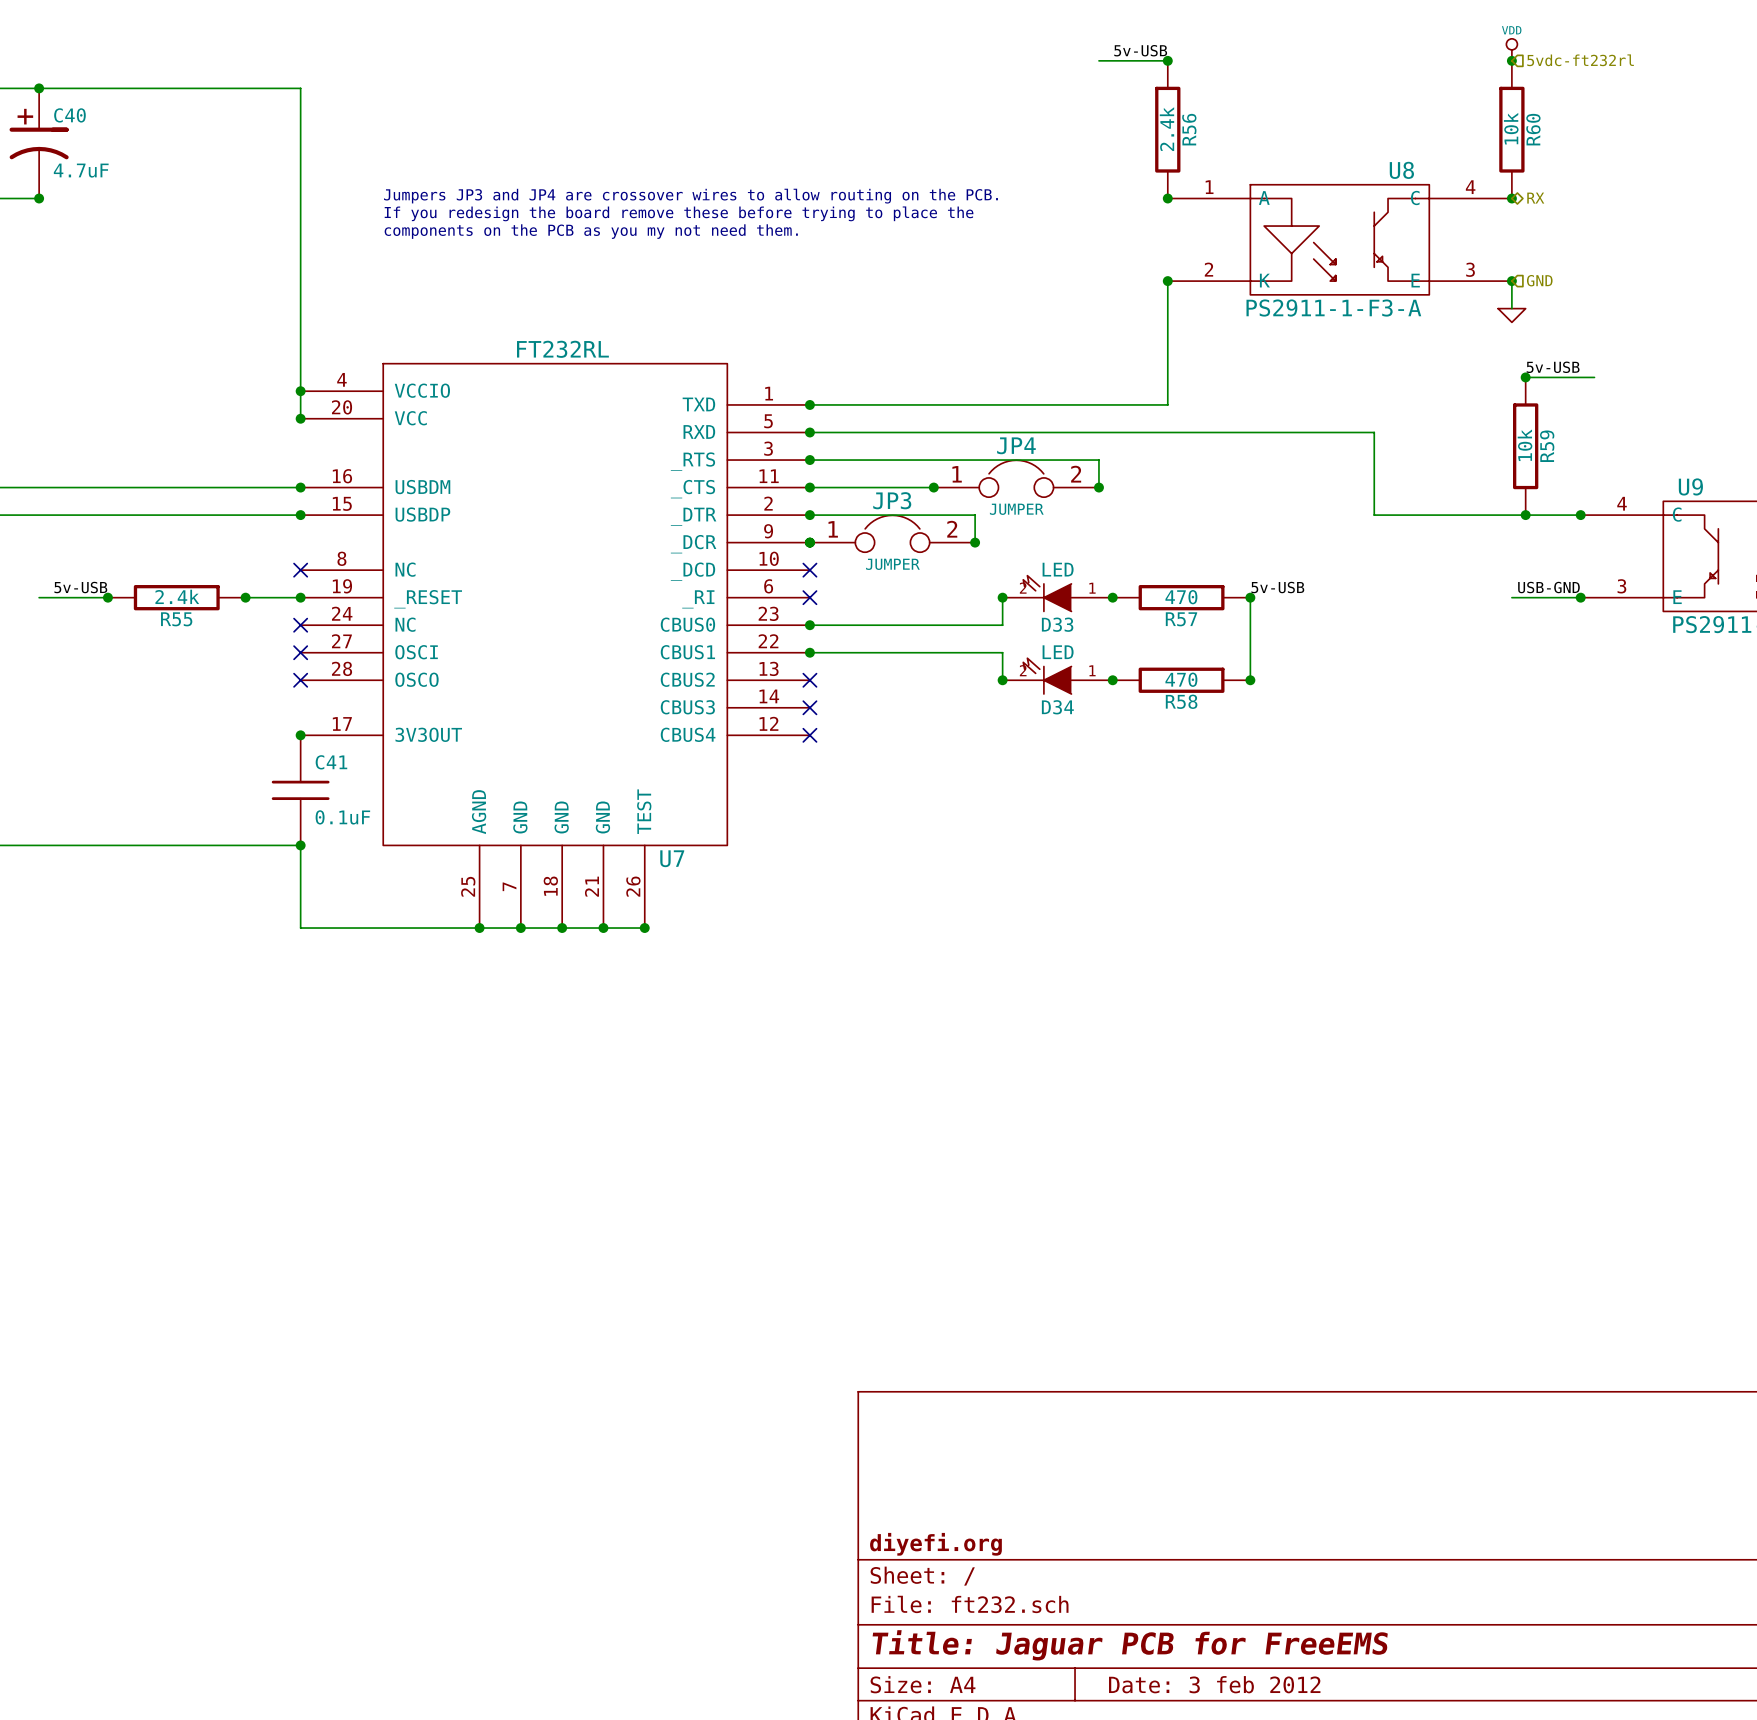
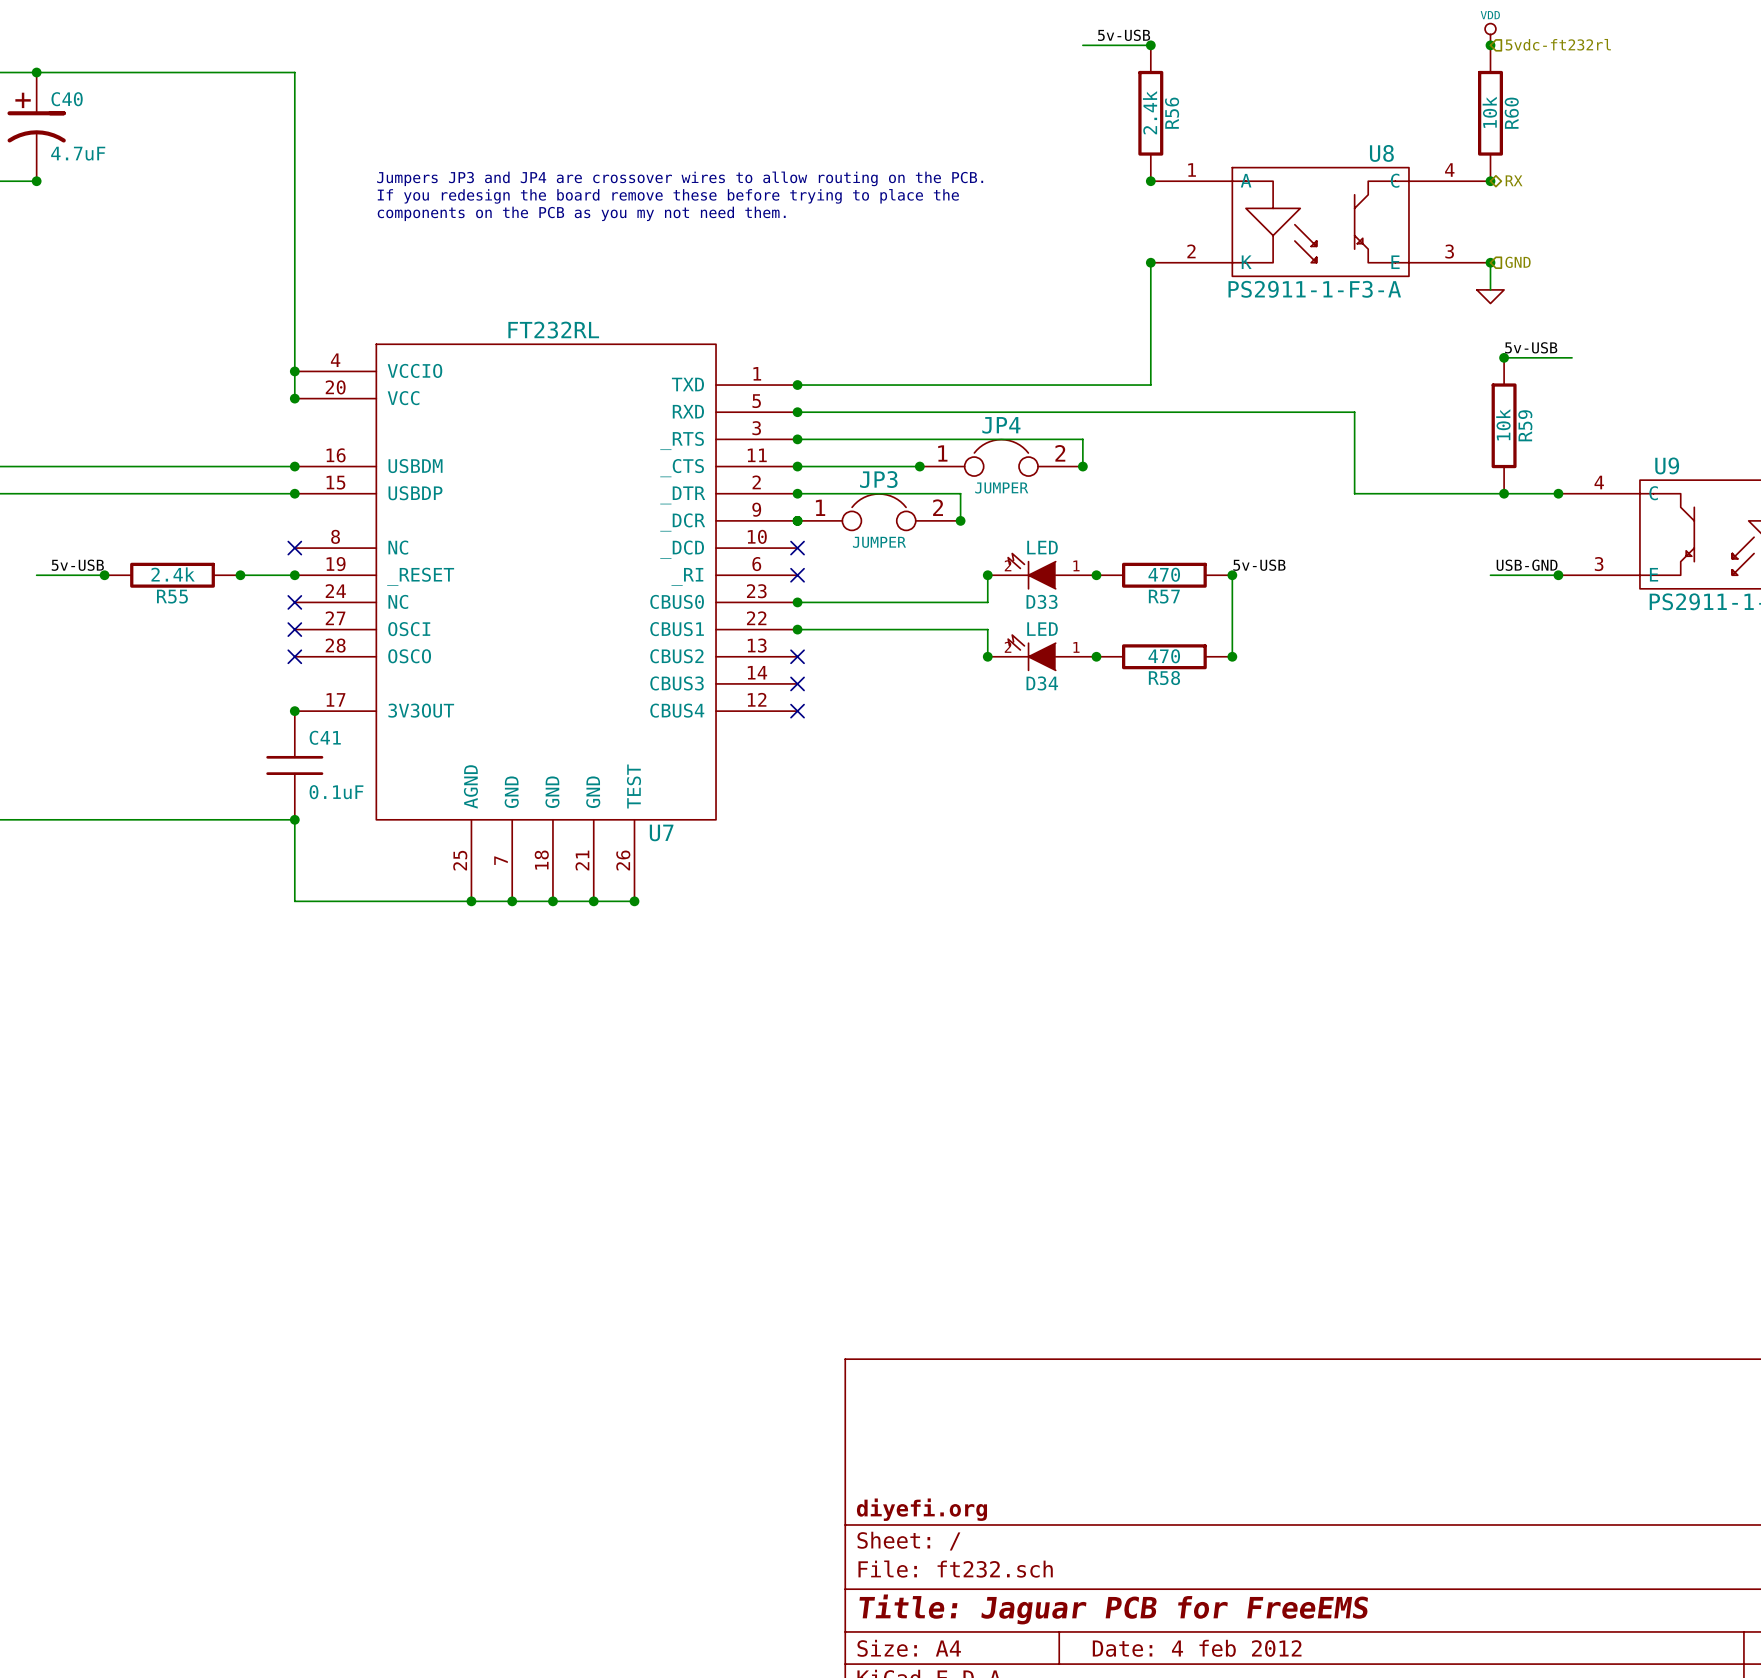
title block: Date: 3 feb 2012 (1214, 1684) -> Date: 4 feb 2012 (1197, 1648)

